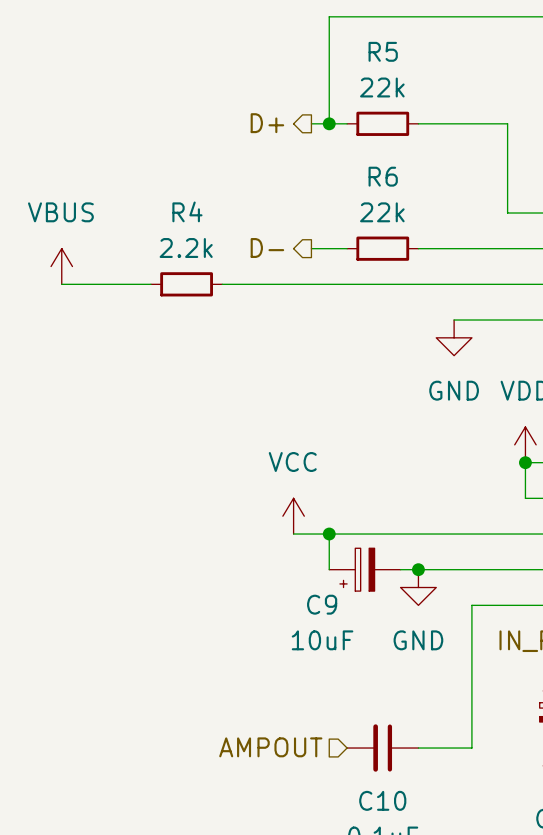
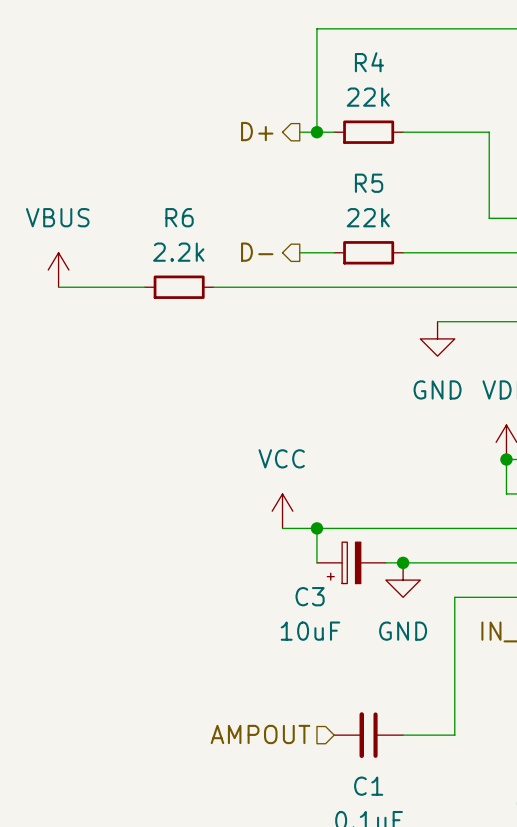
R5 name: R5 (383, 51) -> R4 (369, 62)
R6 name: R6 (383, 176) -> R5 (369, 183)
R4 name: R4 (187, 211) -> R6 (179, 217)
C9 name: C9 (322, 604) -> C3 (310, 596)
C10 name: C10 (382, 800) -> C1 (368, 786)

